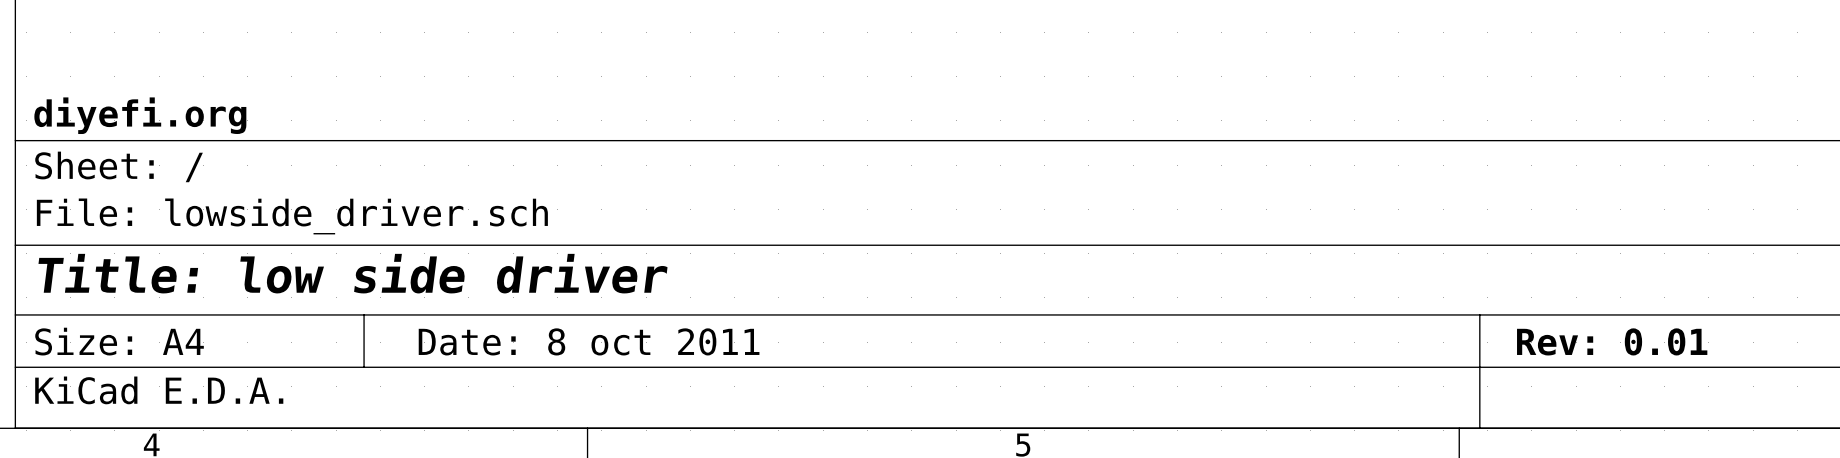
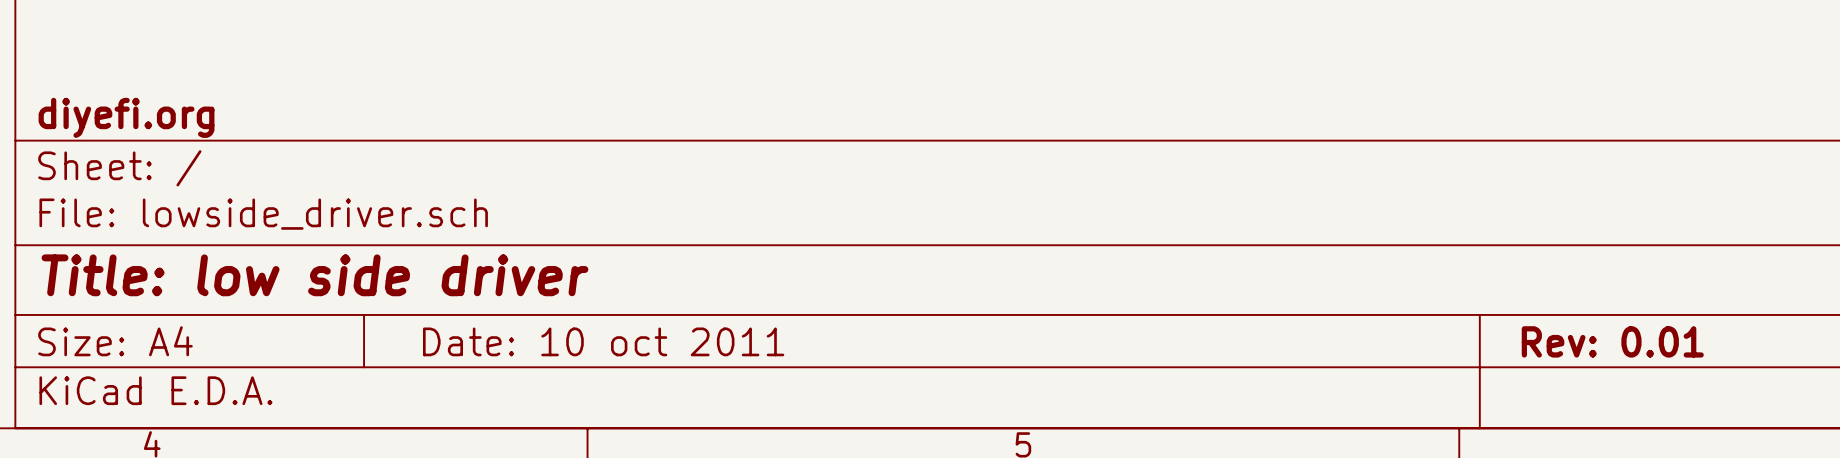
title block: Date: 8 oct 2011 (589, 341) -> Date: 10 oct 2011 (603, 341)

